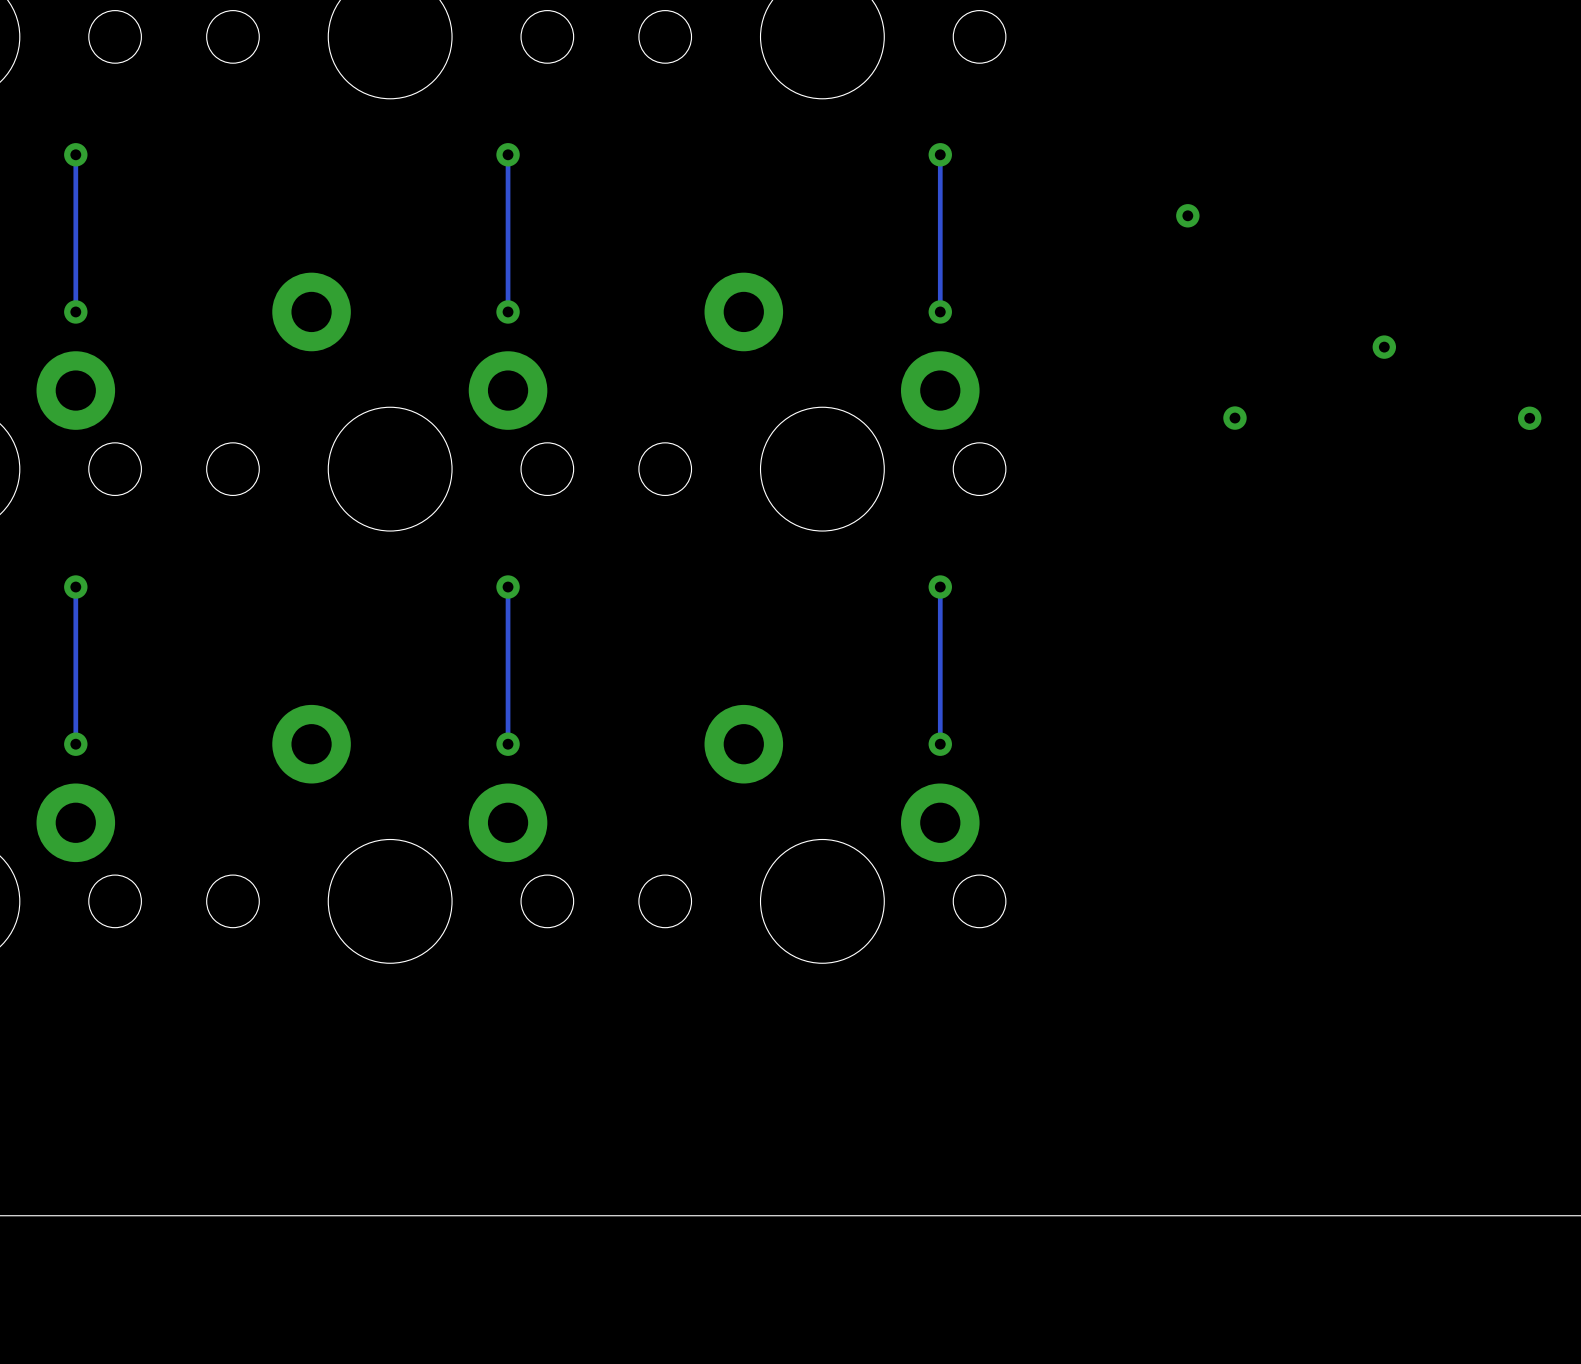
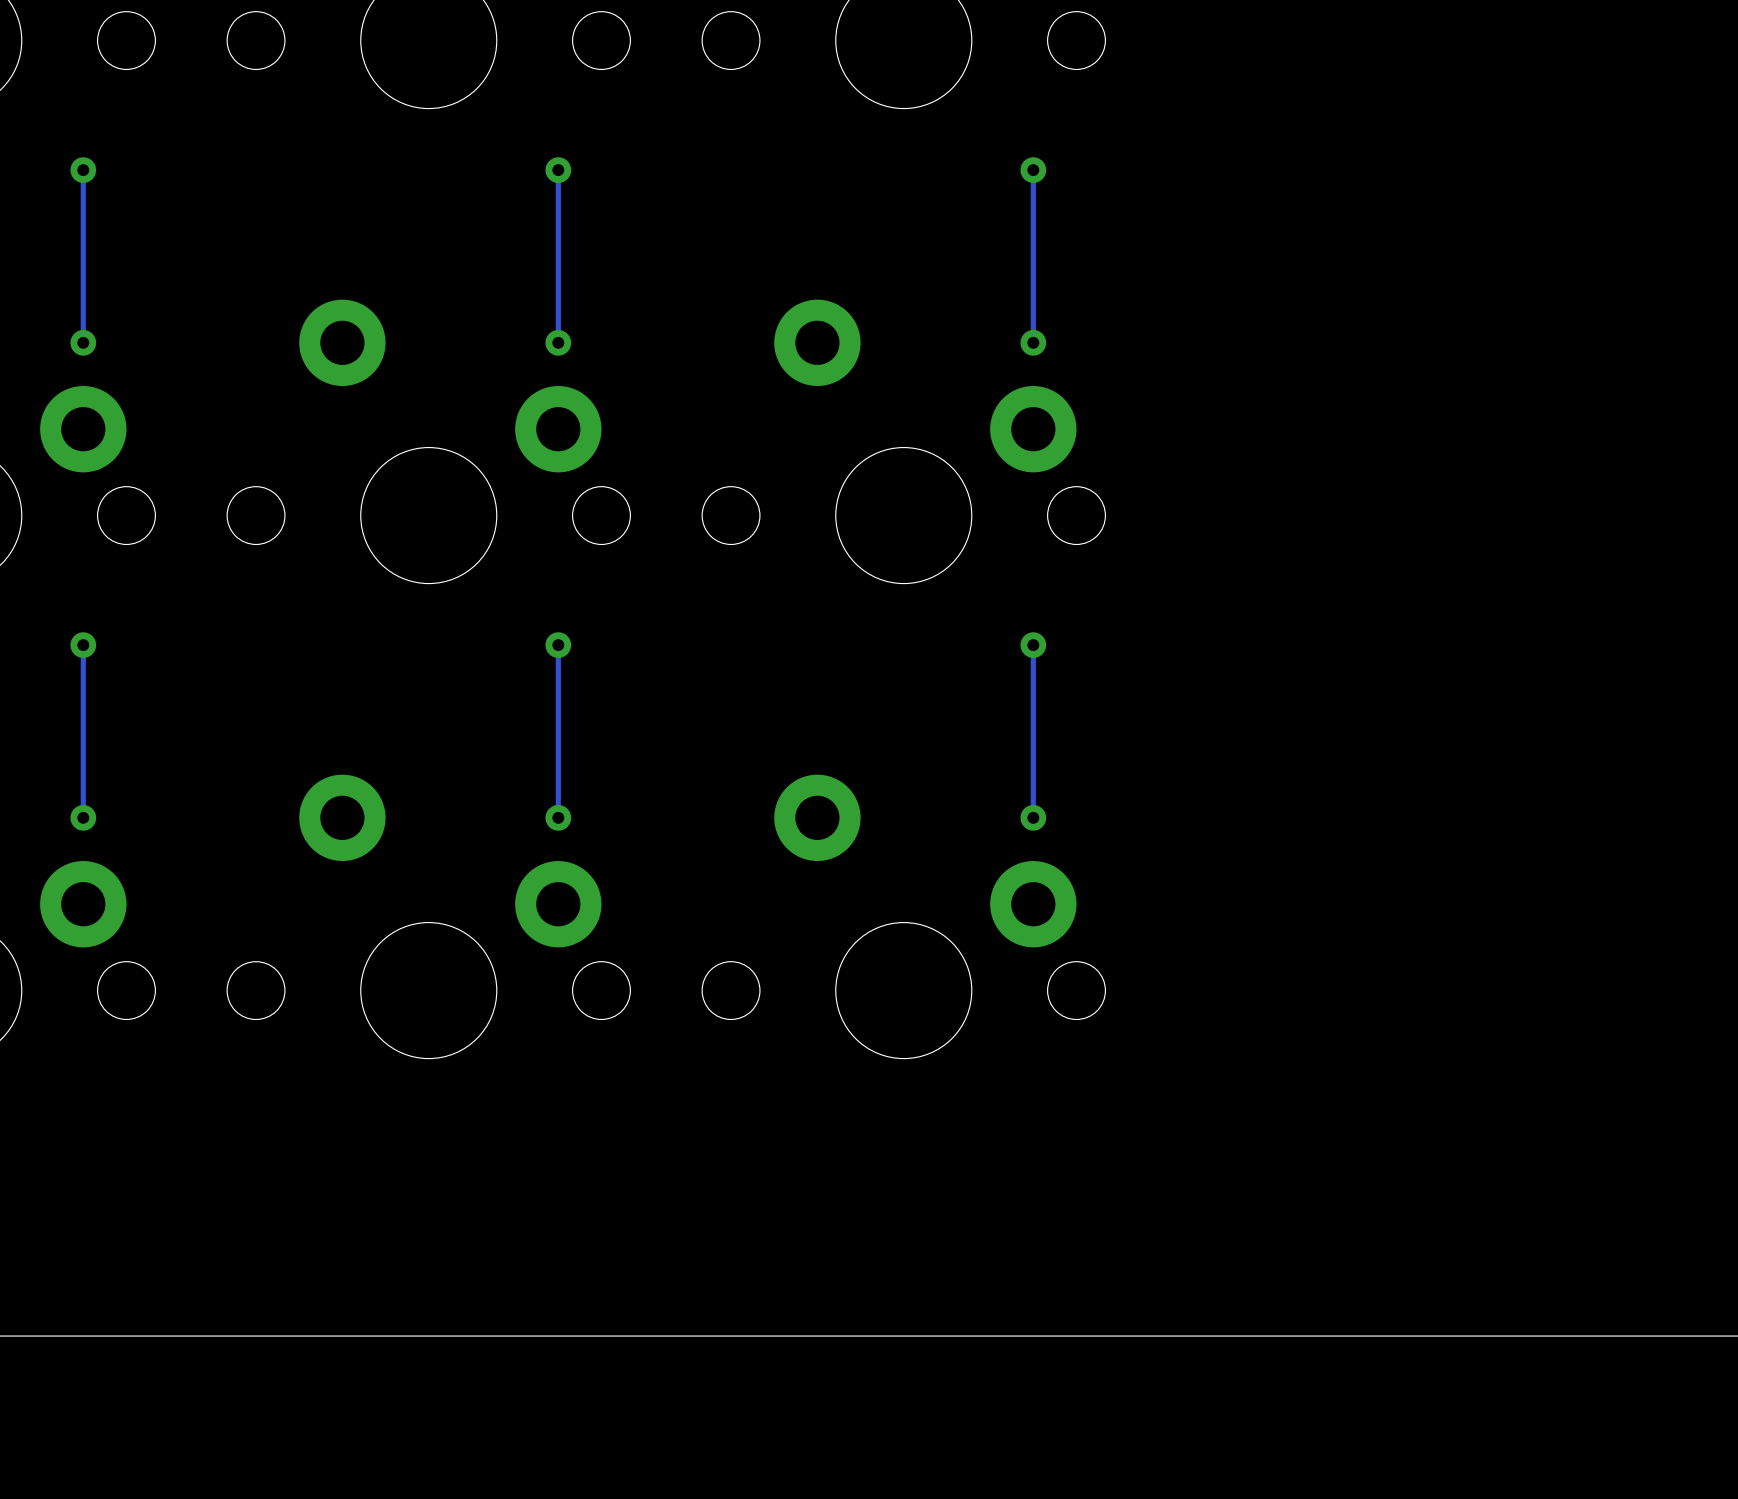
via: (1187, 215) -> none
via: (1384, 347) -> none
via: (1234, 418) -> none
via: (1529, 418) -> none

